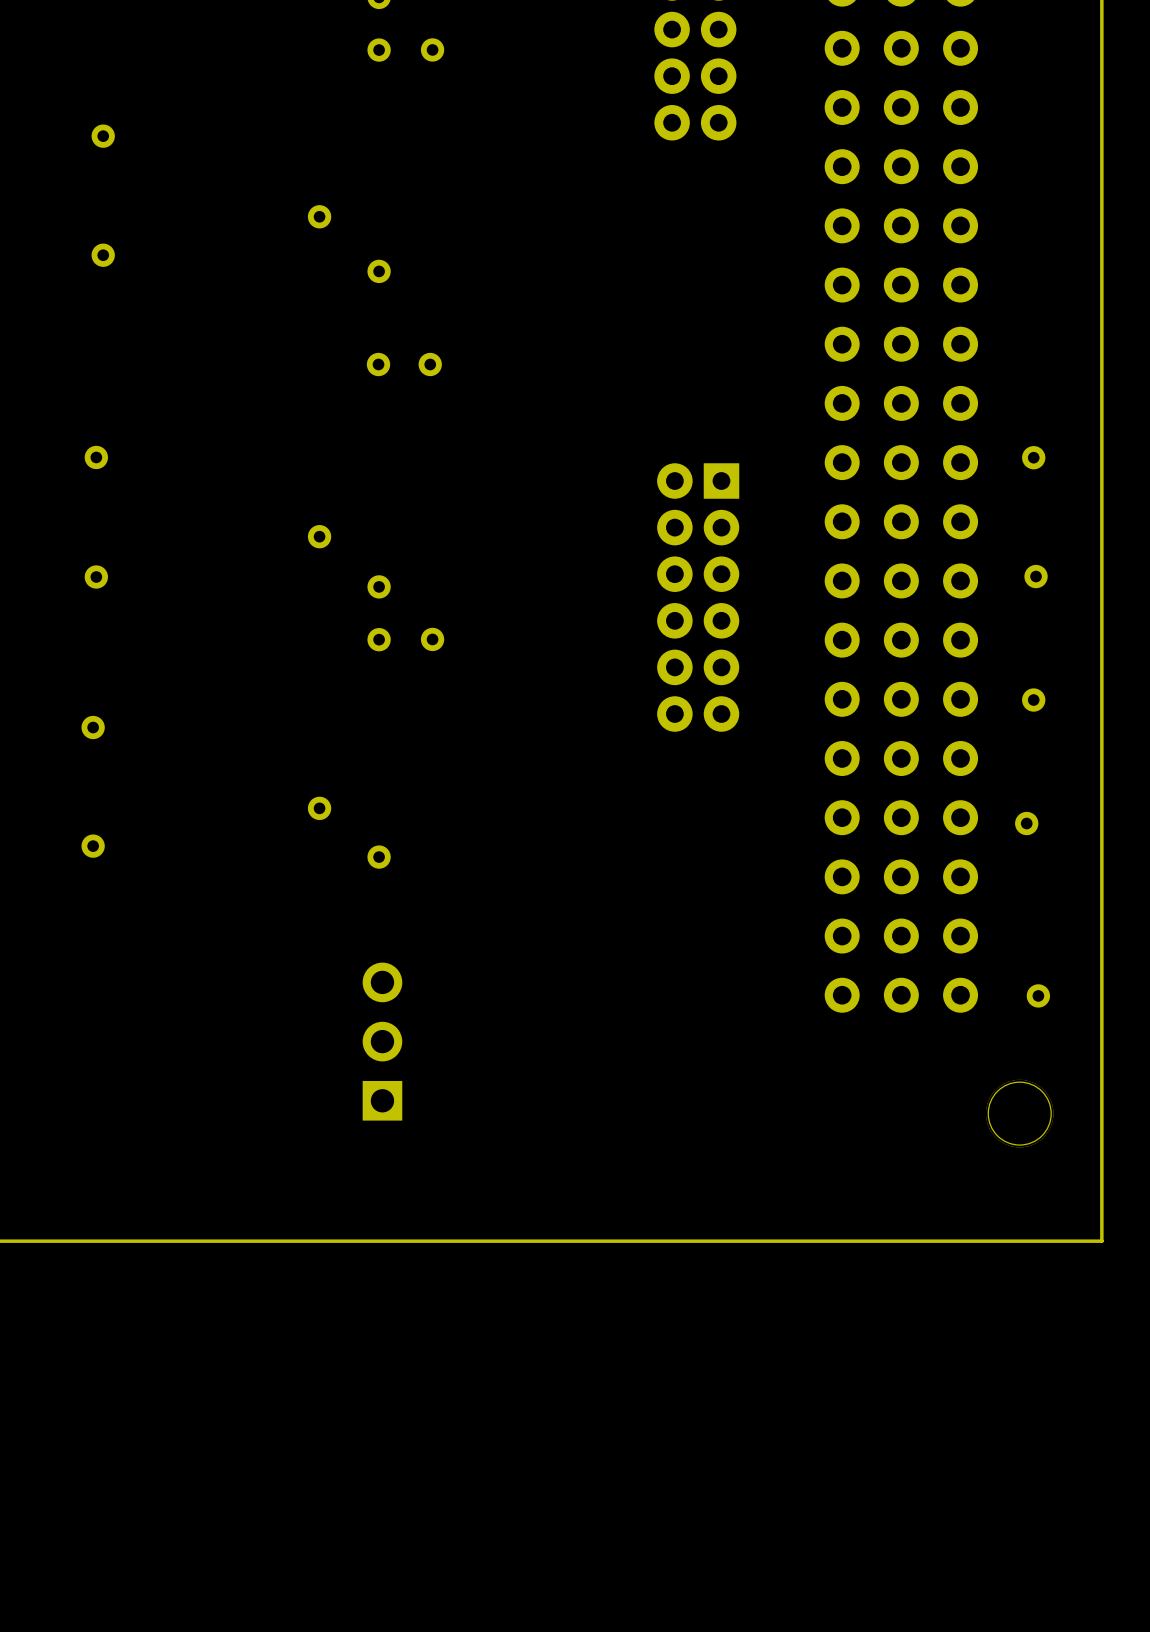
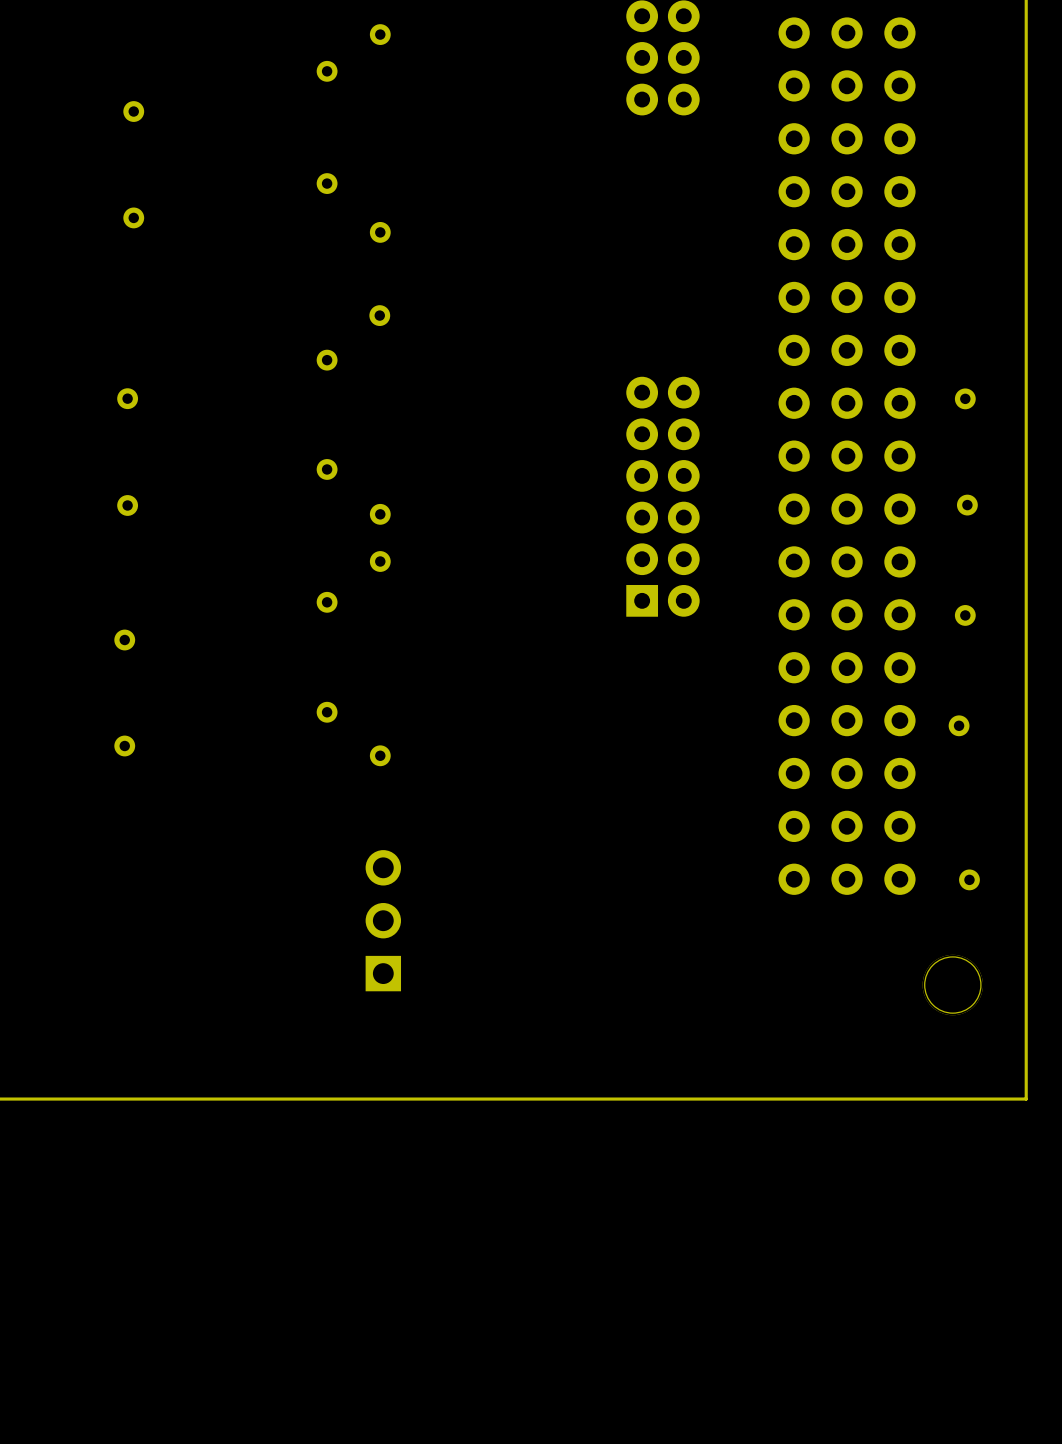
part position: (432, 49) -> (327, 71)
part position: (430, 364) -> (327, 360)
part rotation: 0° (698, 597) -> 180° (662, 496)
part position: (432, 639) -> (327, 602)

